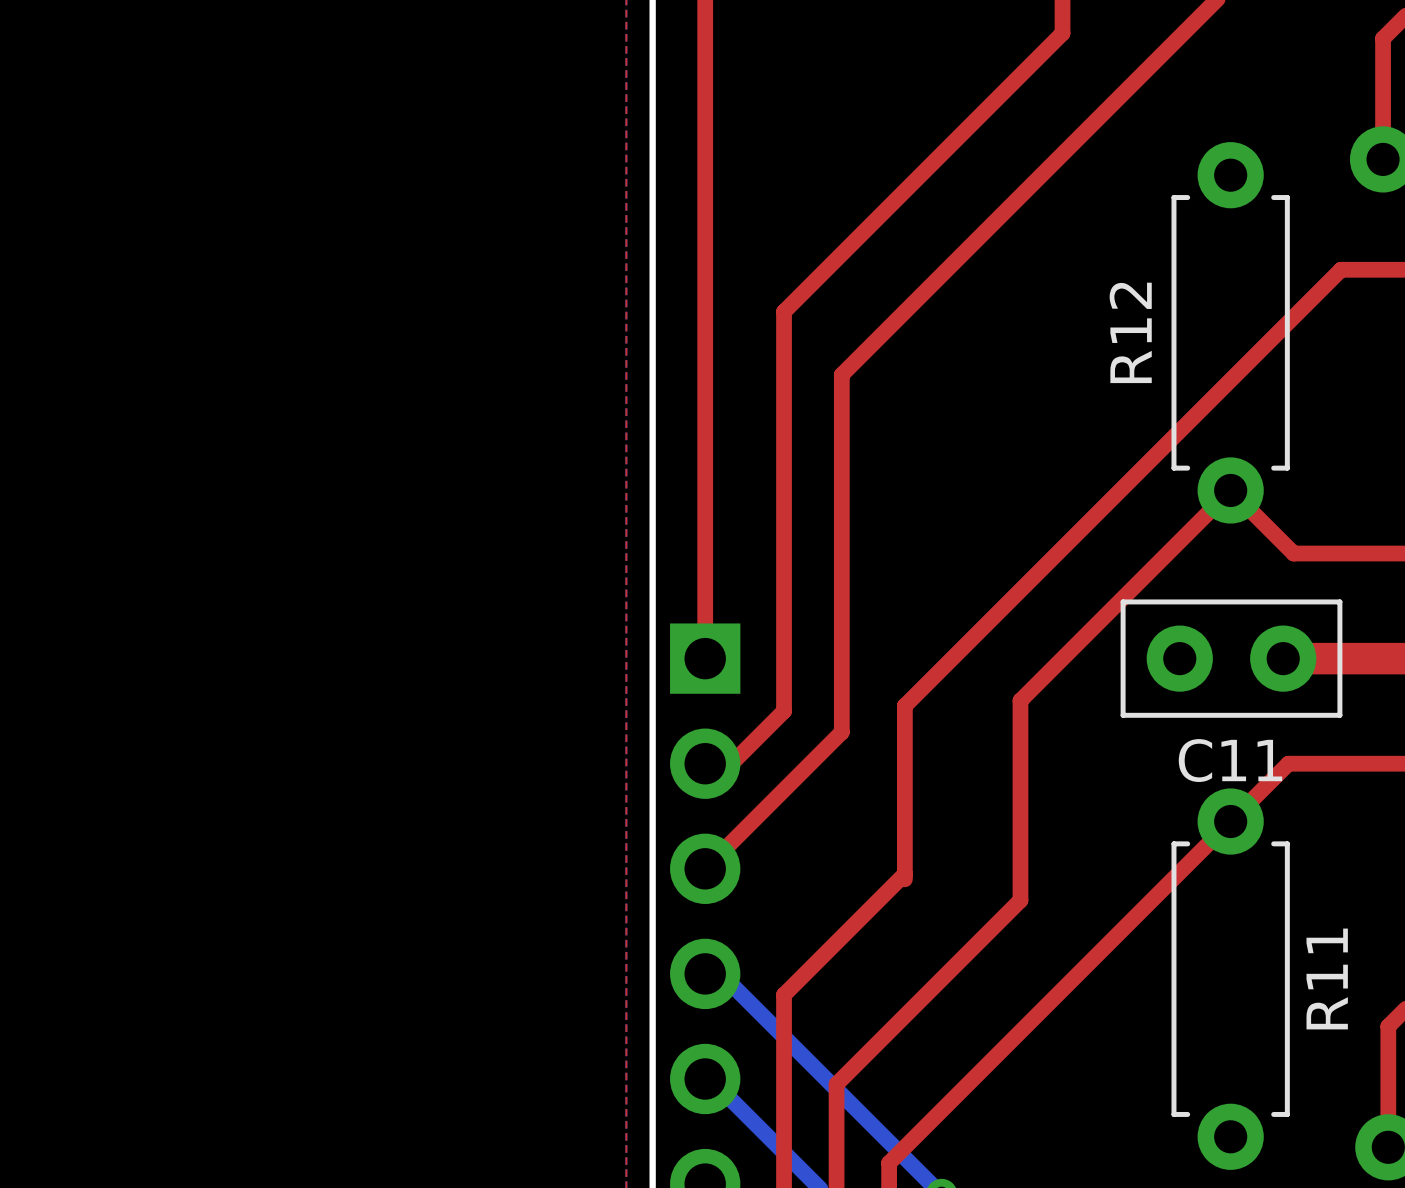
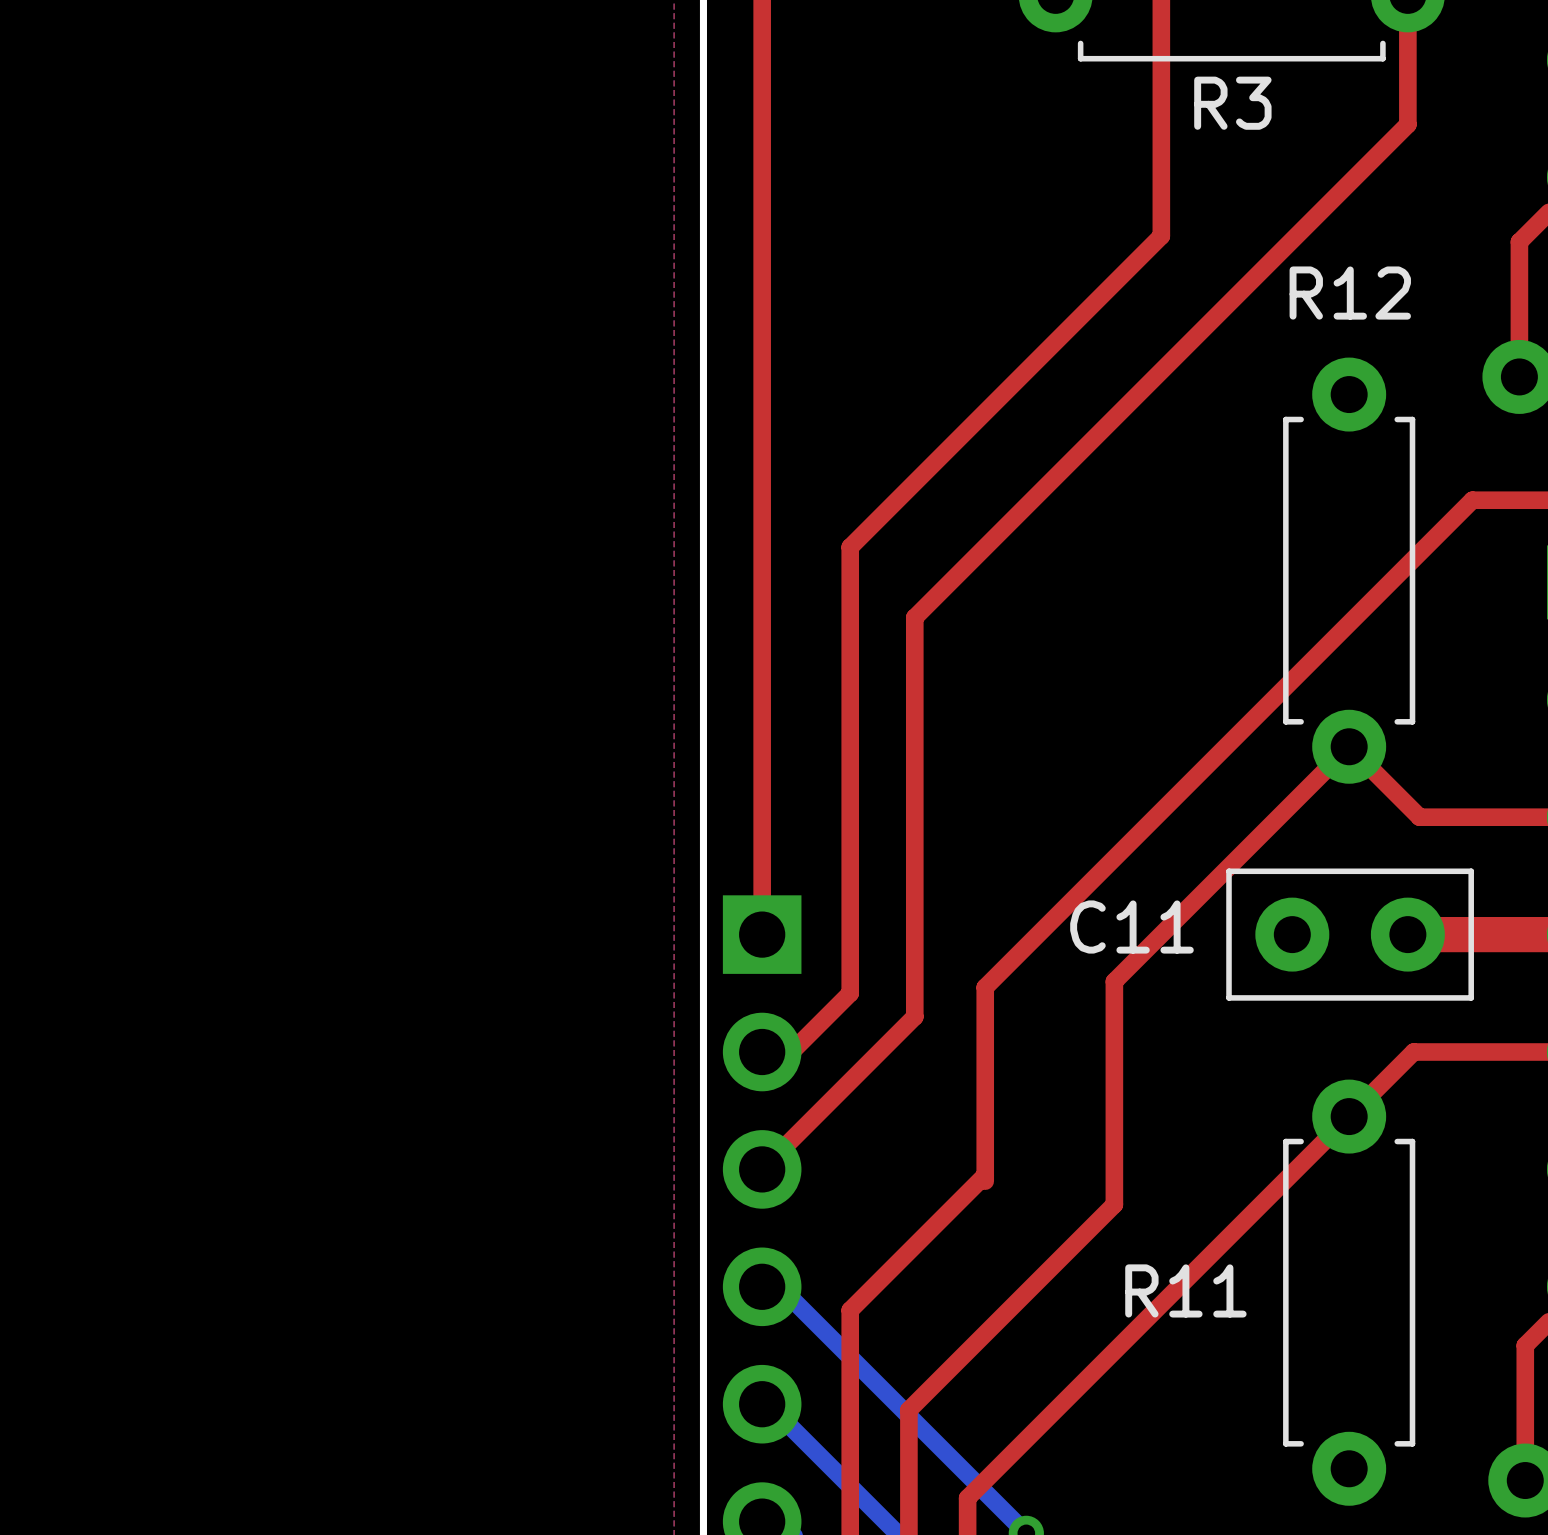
R12 name rotation: 0° (1130, 332) -> 90° clockwise (1350, 293)
R12 name position: R12 (1130, 332) -> R12 (1350, 293)
C11 name position: C11 (1230, 760) -> C11 (1131, 927)
R11 name rotation: 0° (1327, 978) -> 90° clockwise (1185, 1290)
R11 name position: R11 (1327, 978) -> R11 (1185, 1290)

